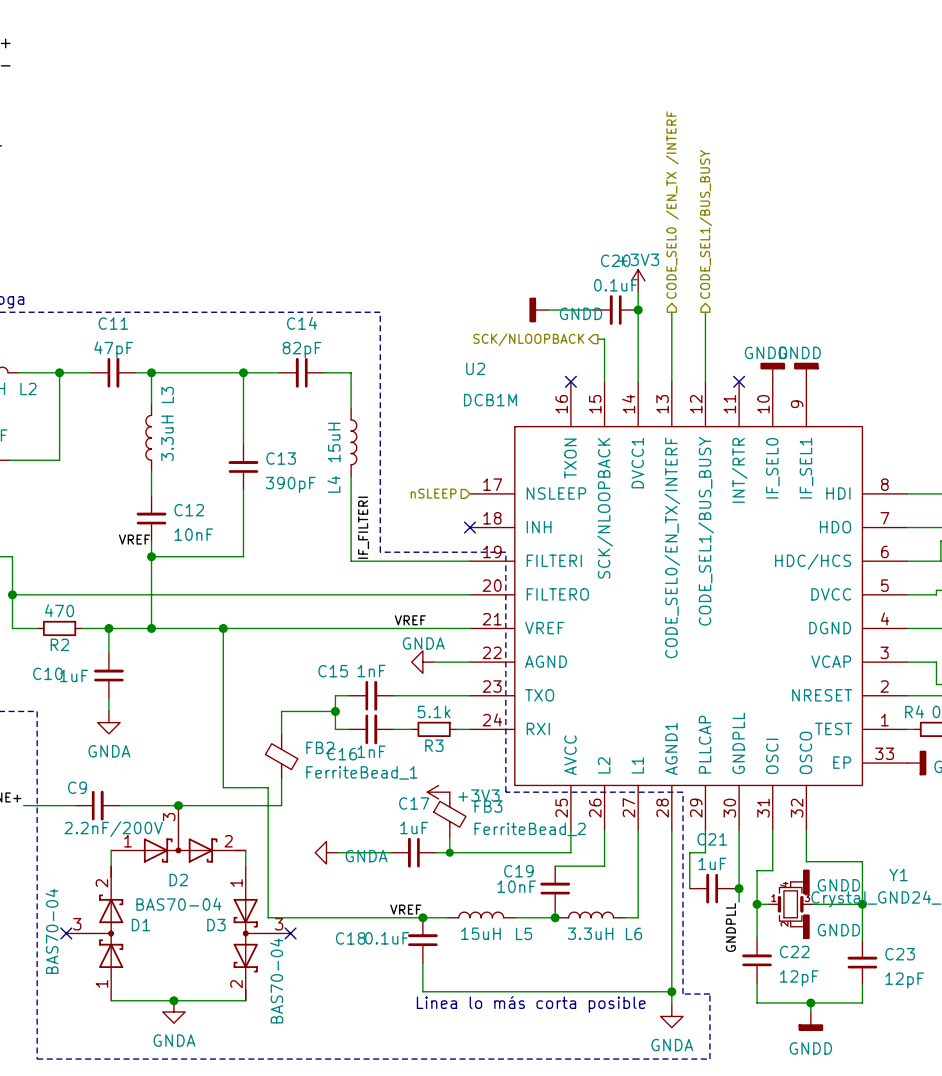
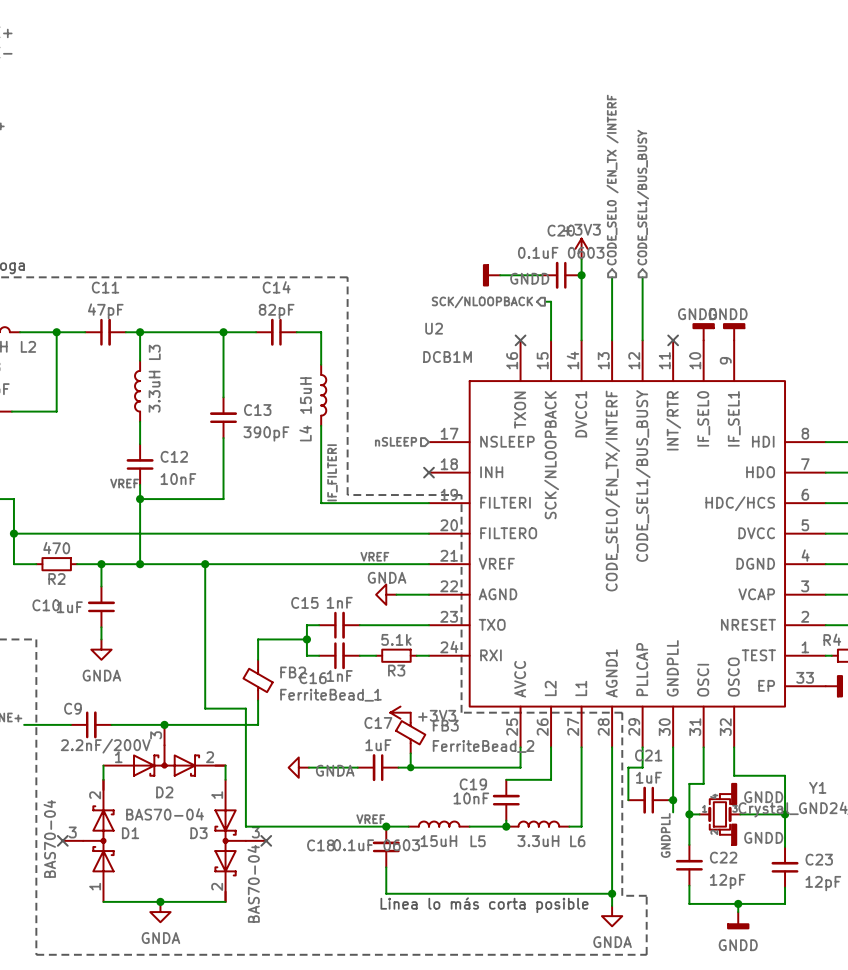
C20 value: 0.1uF (616, 285) -> 0.1uF 0603 (561, 252)
C18 value: 0.1uF (387, 938) -> 0.1uF 0603 (376, 845)

